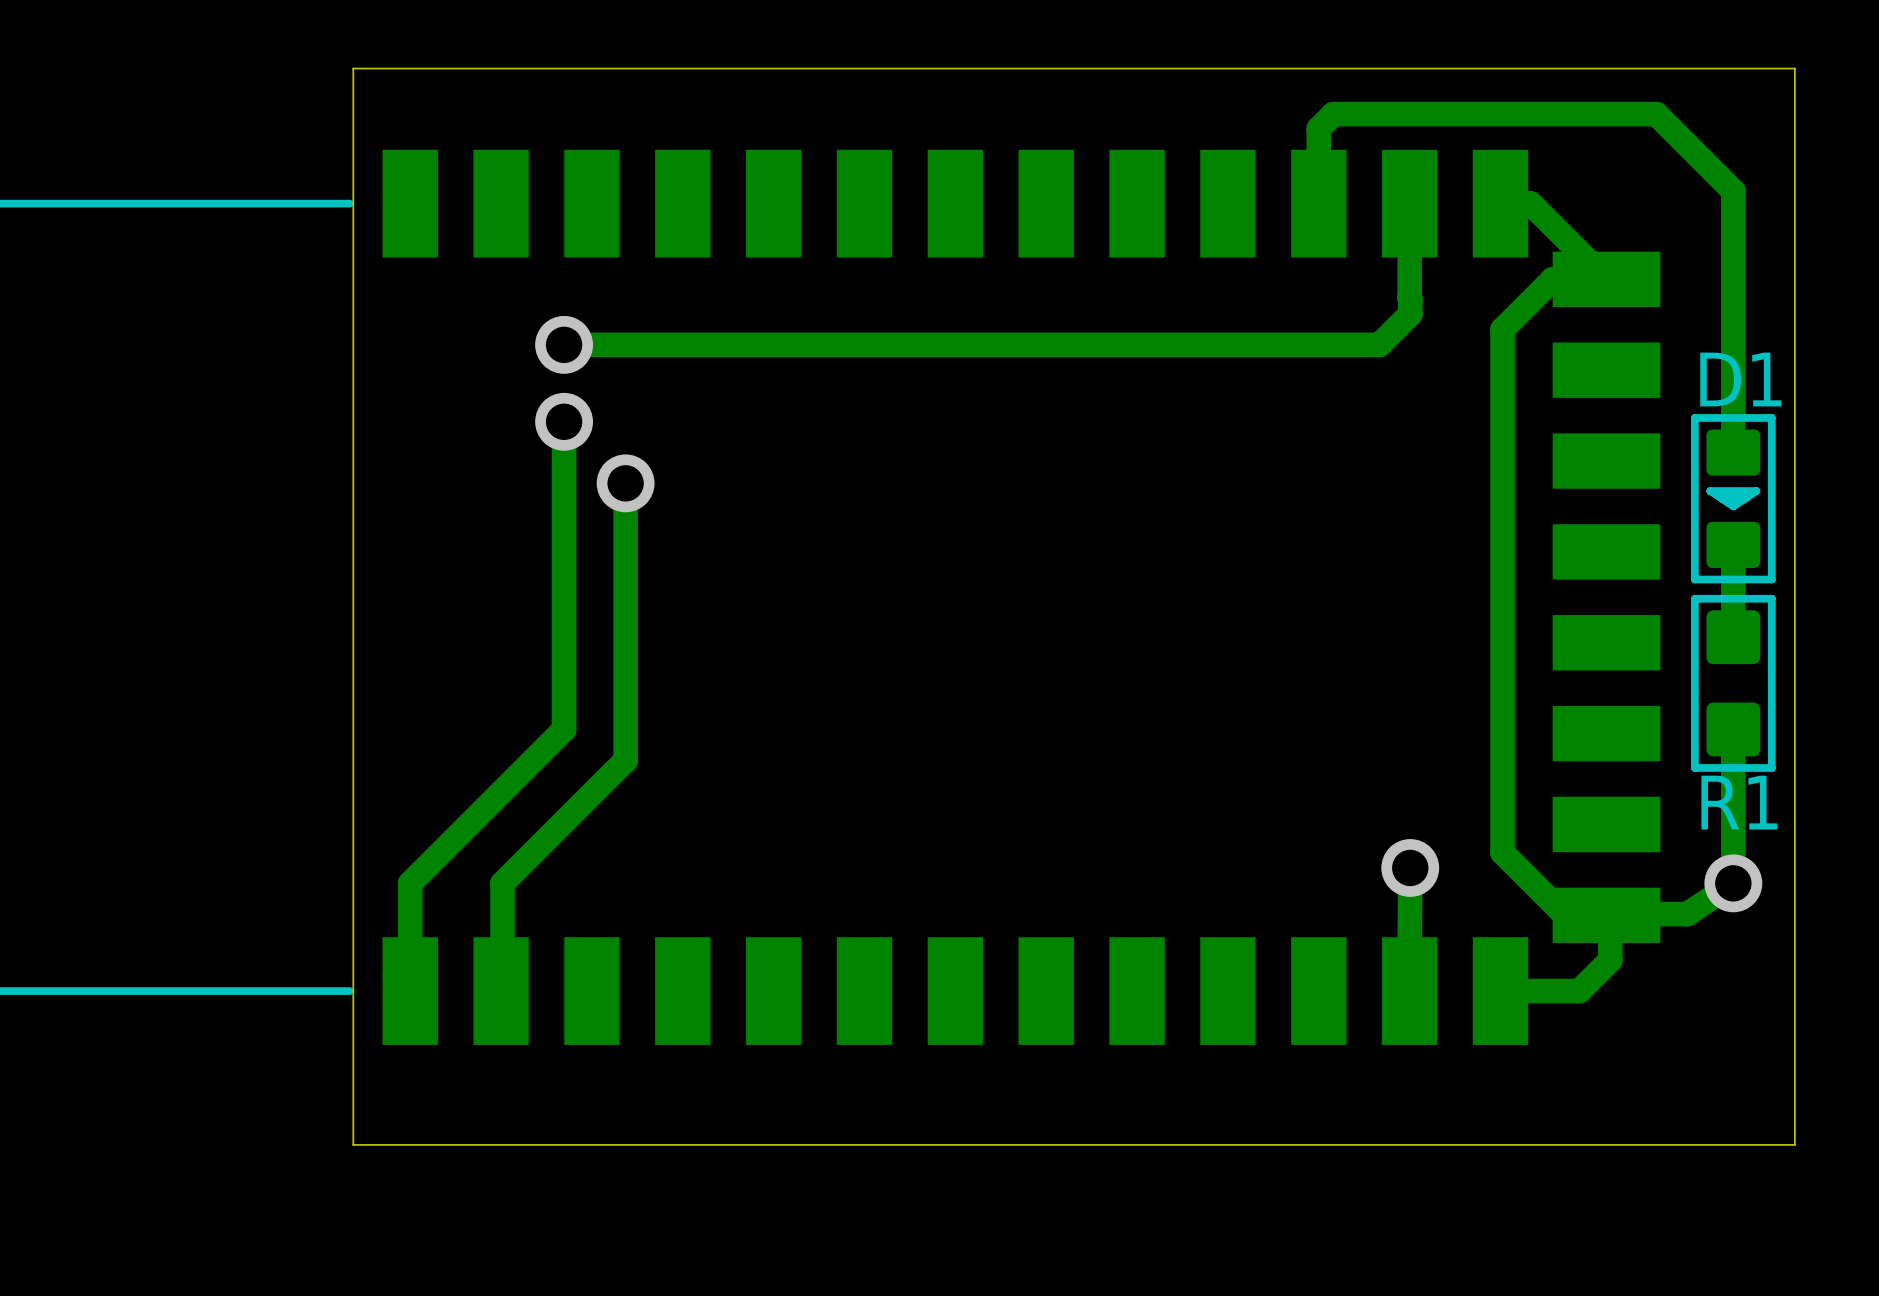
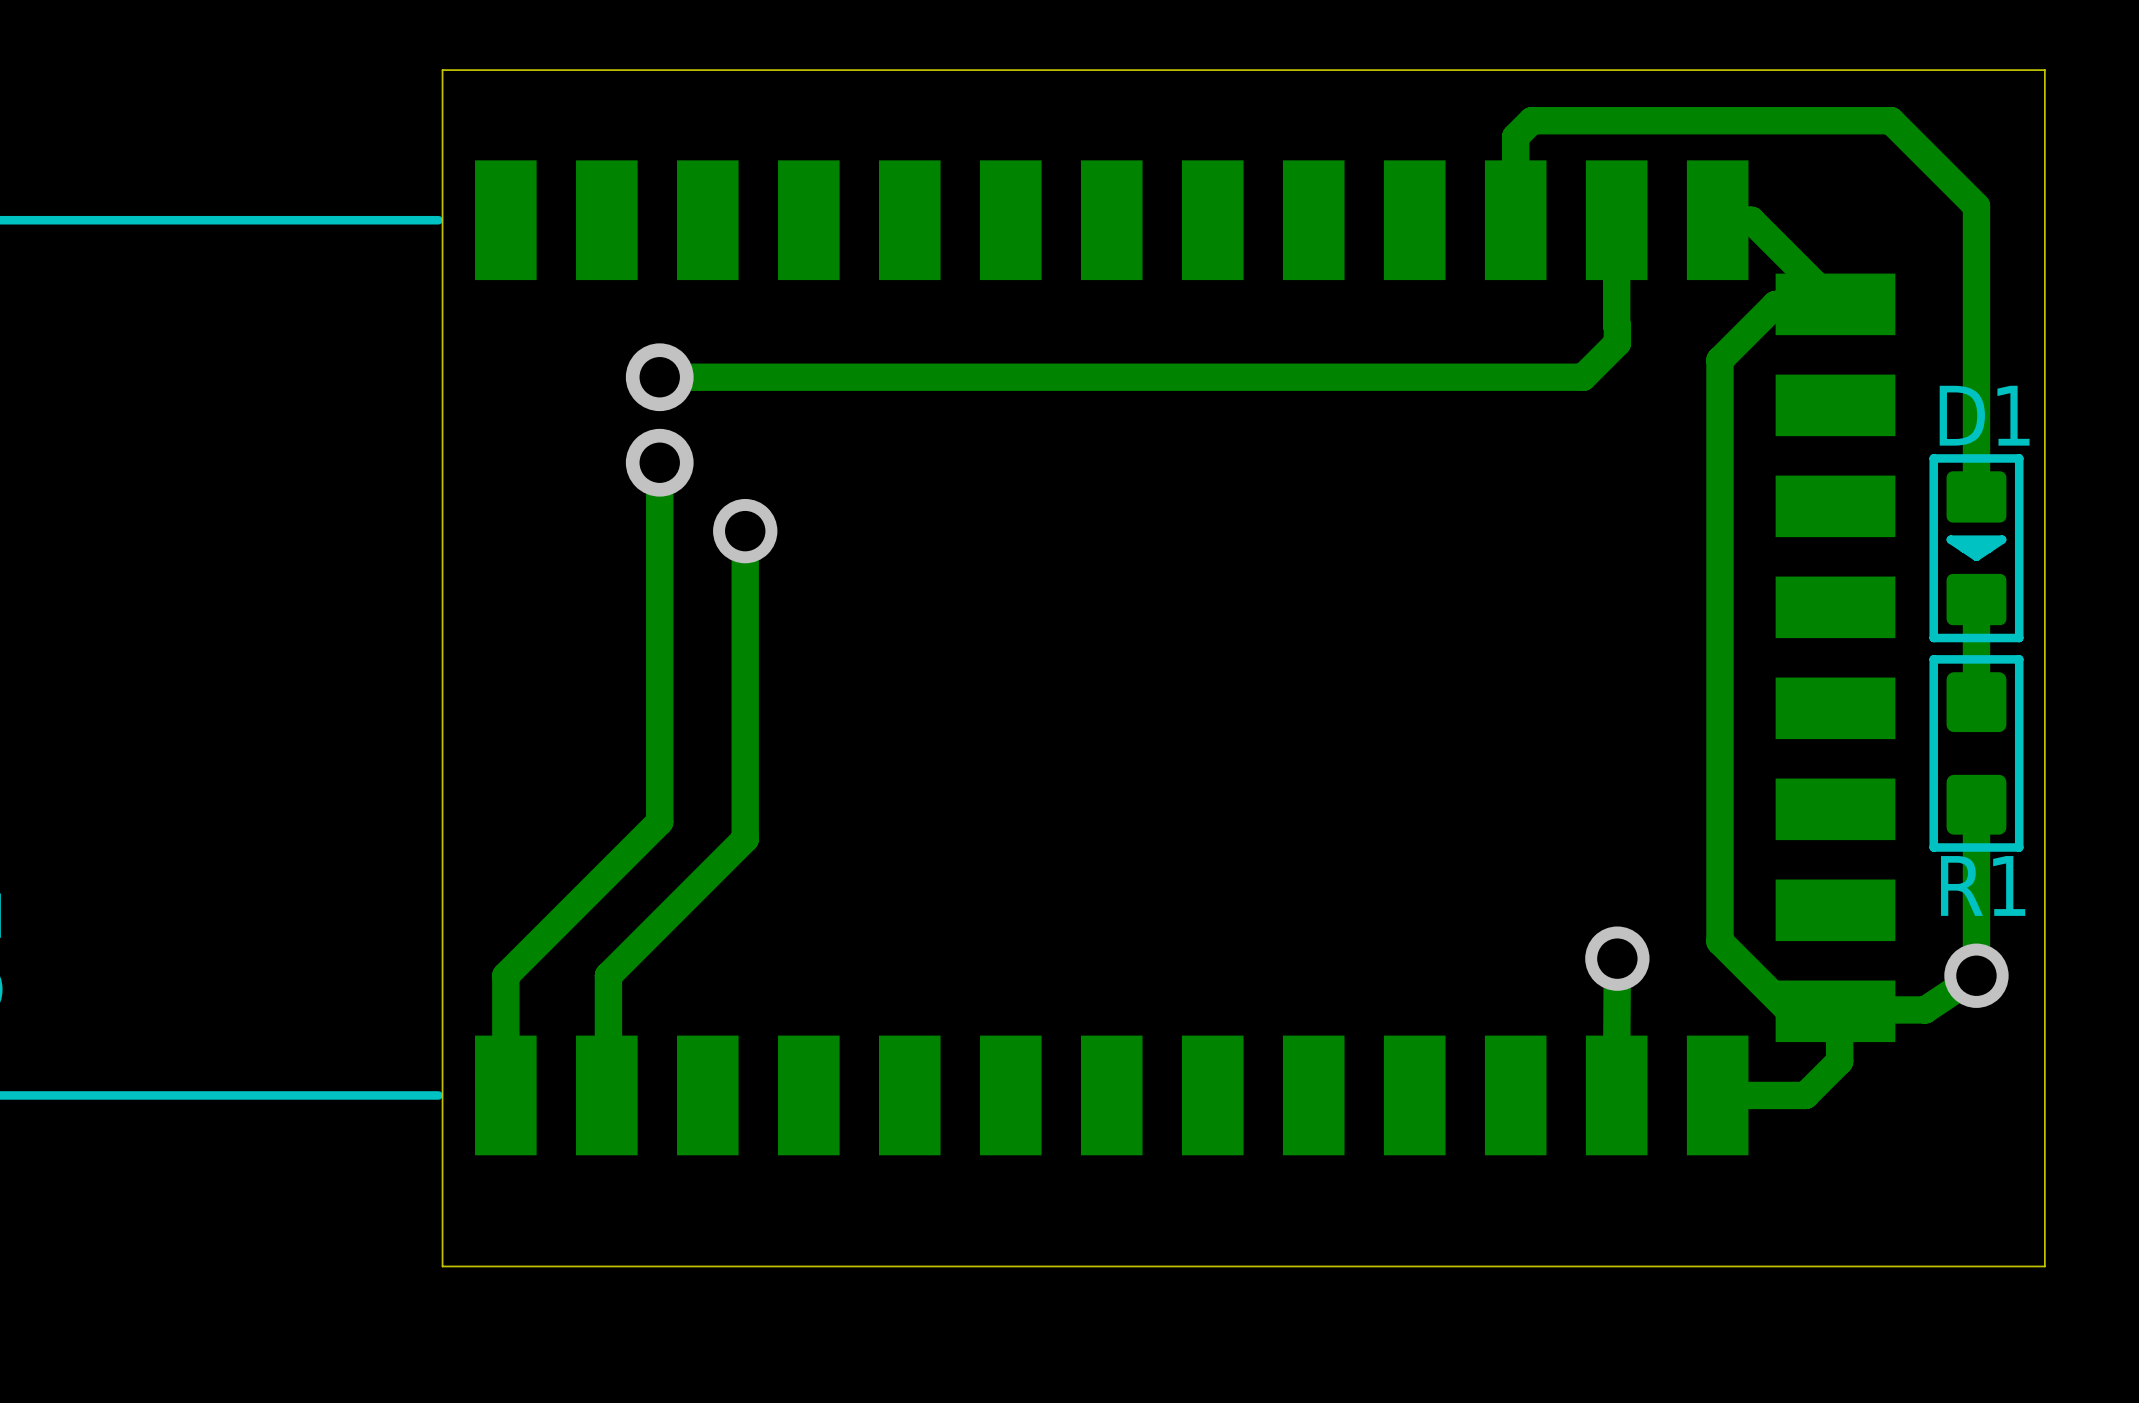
via position: (564, 344) -> (659, 377)
track: (564, 421) (564, 729) (548, 744) -> (659, 462) (659, 821)
via position: (564, 421) -> (659, 462)

